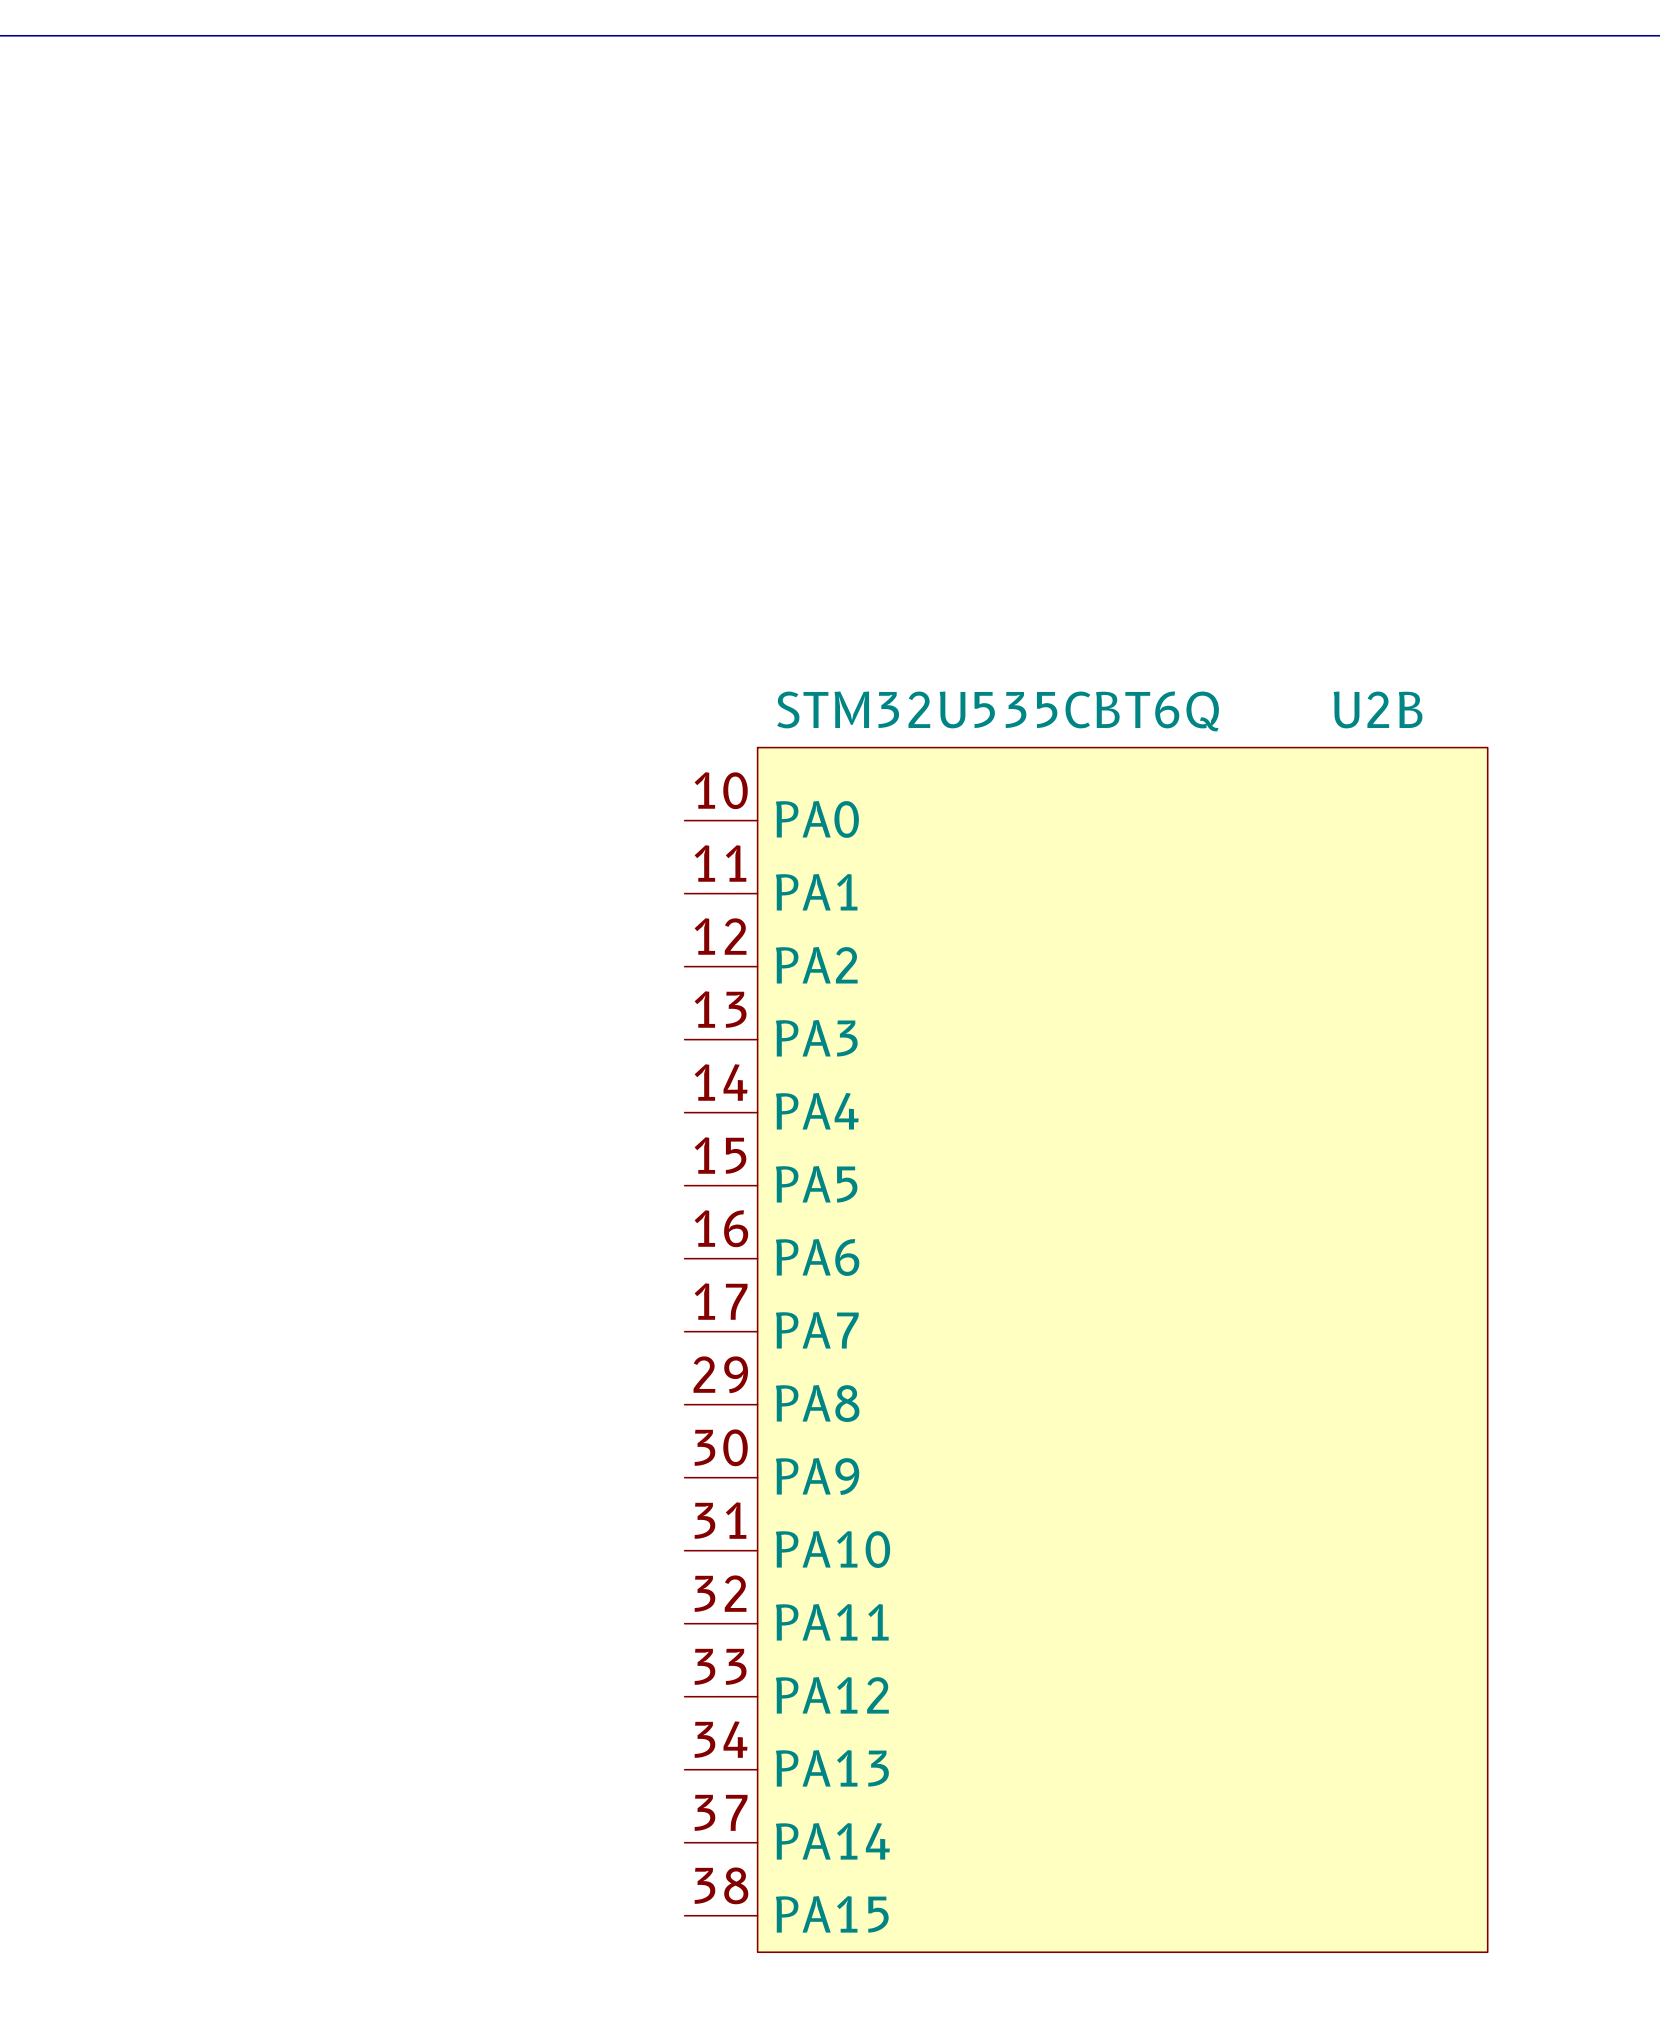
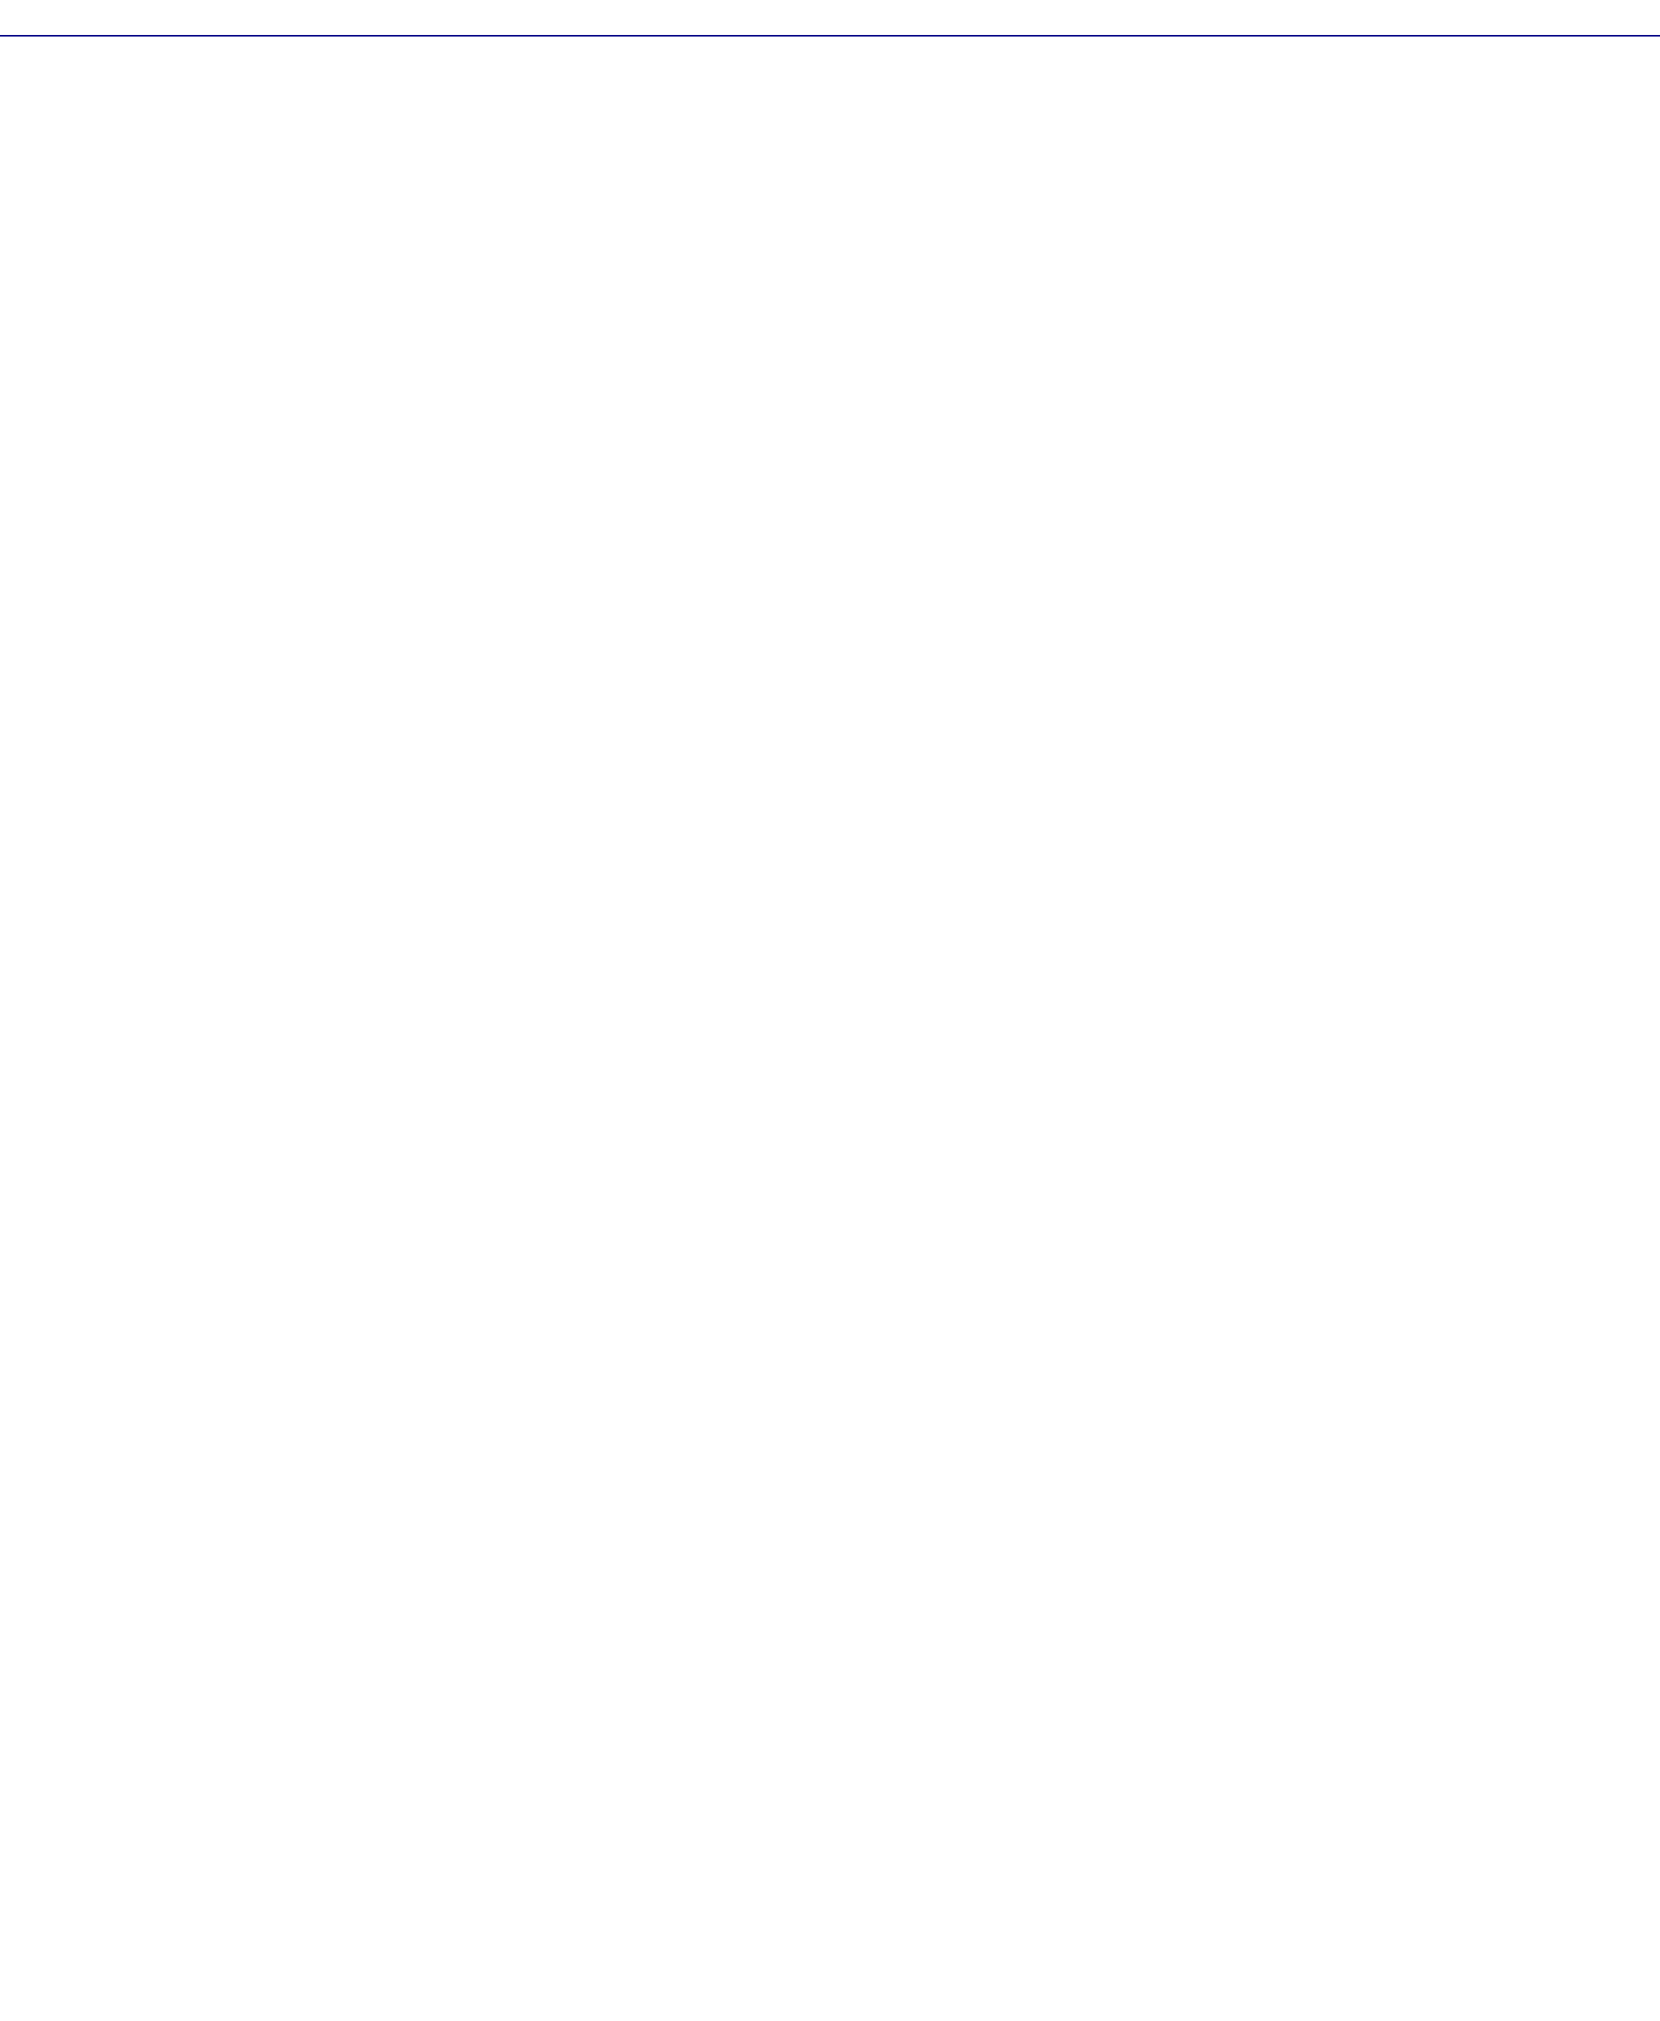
U2B: STM32U535CBT6Q (1086, 1349) -> none

